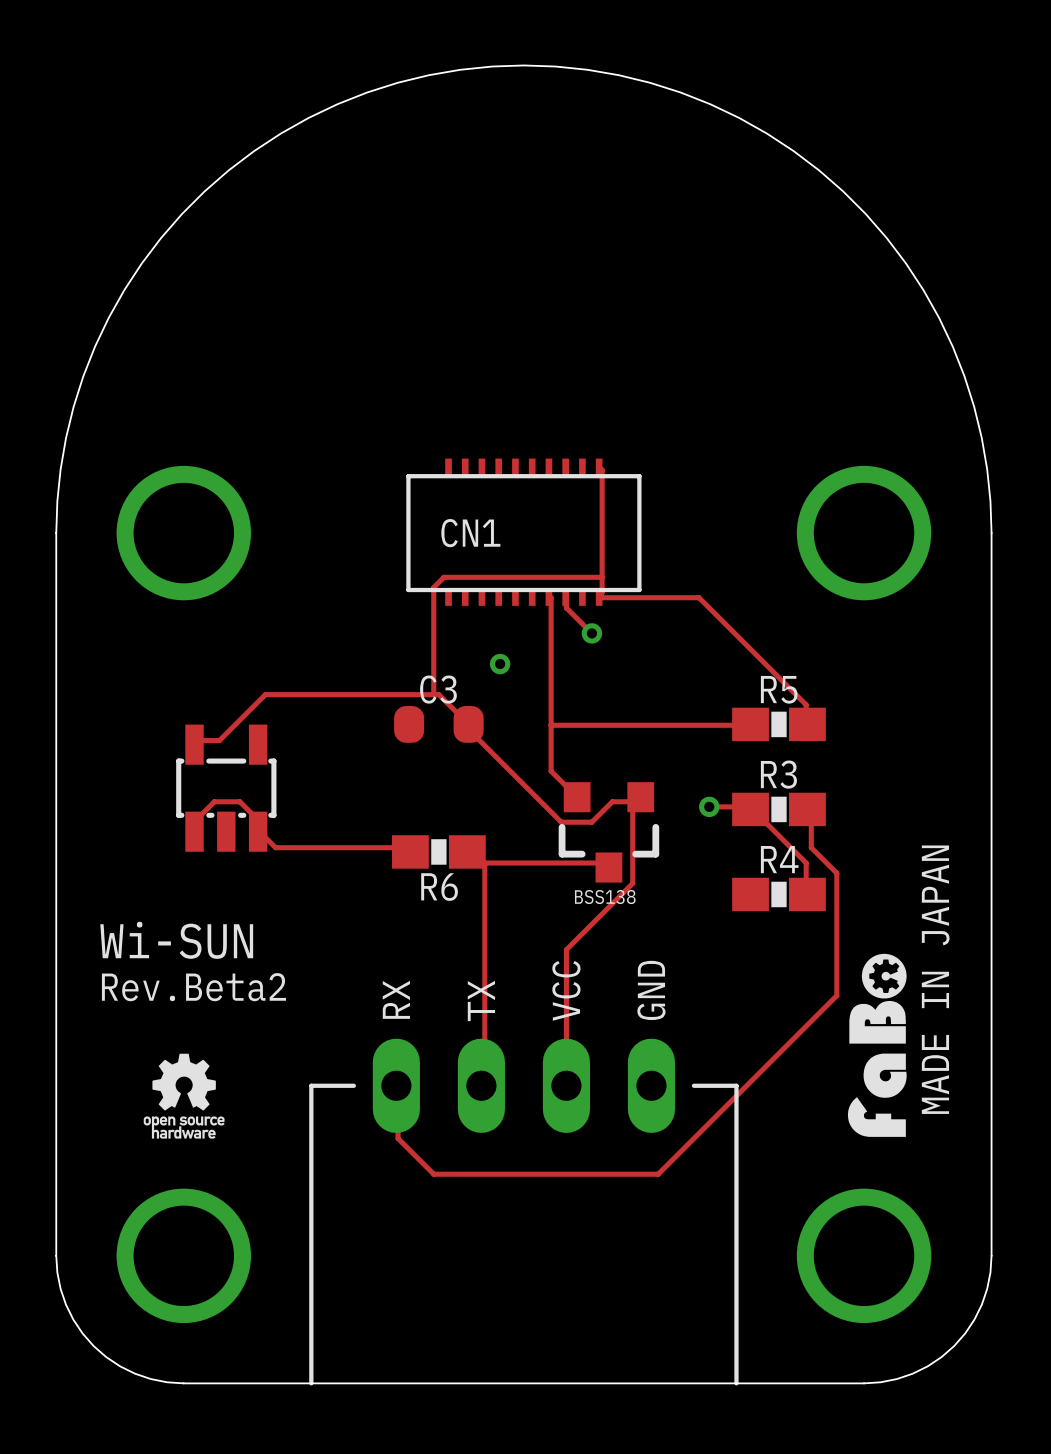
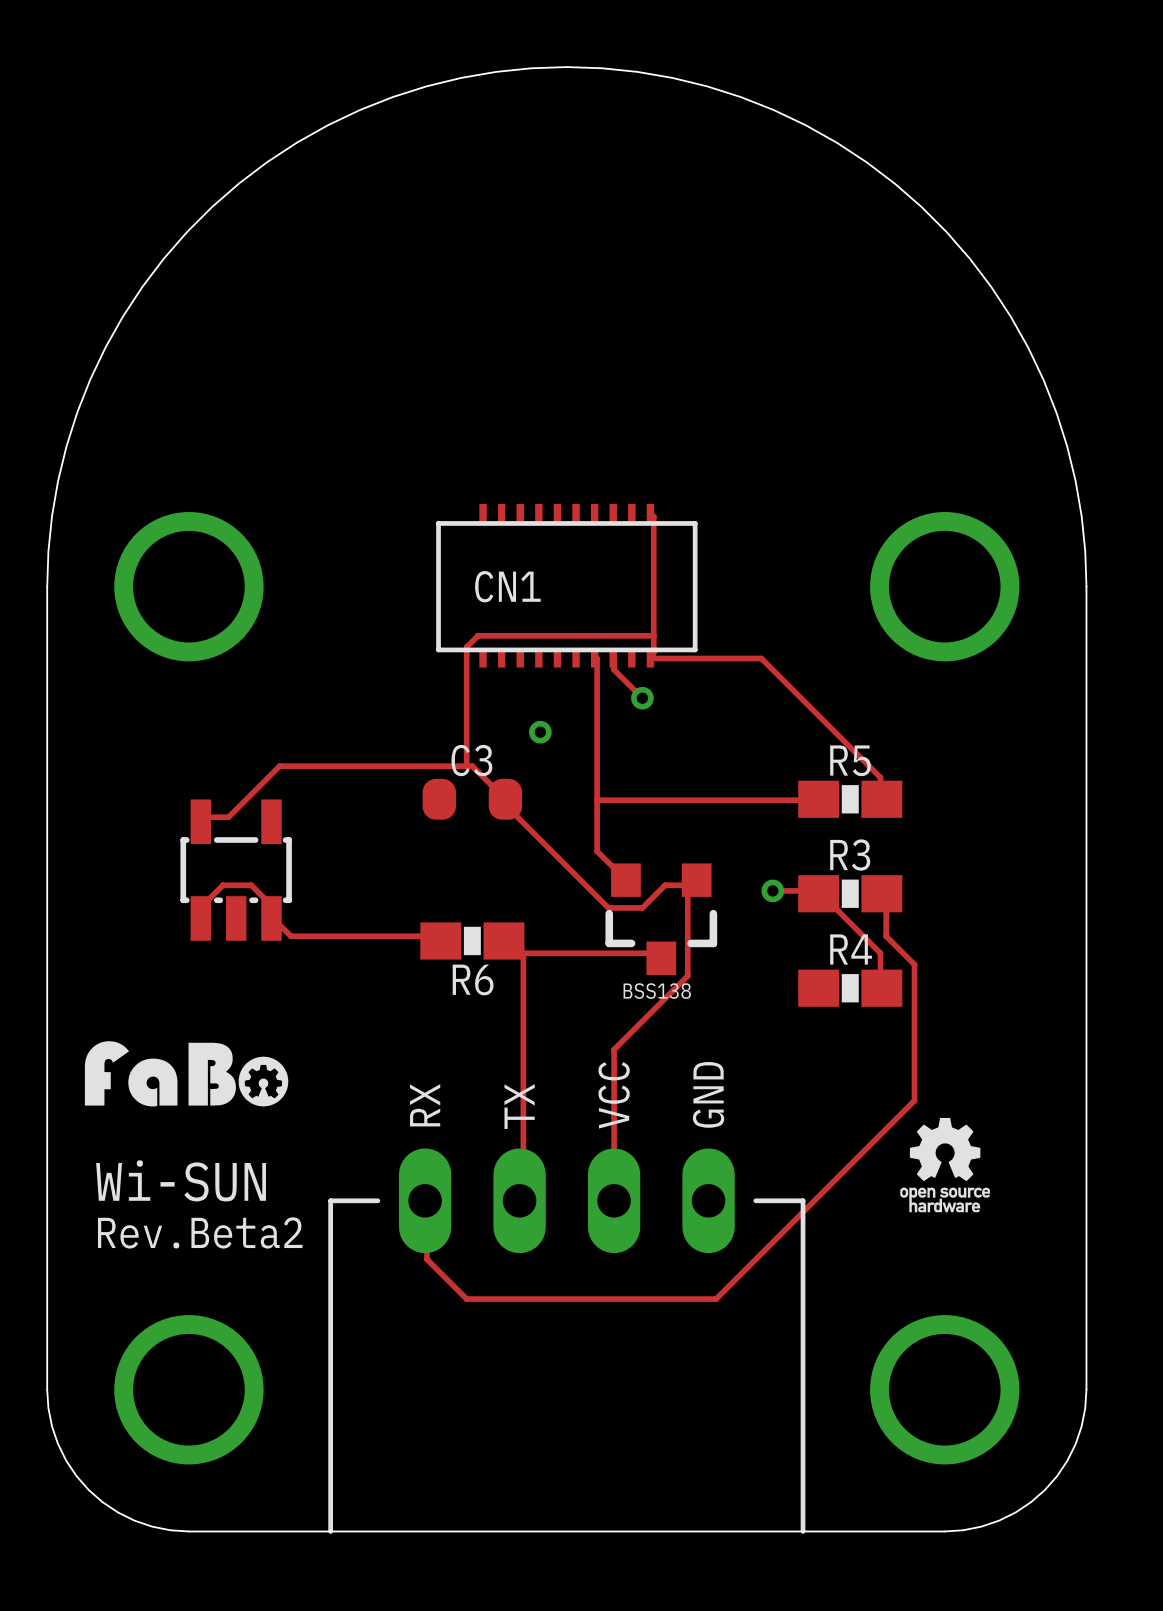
text position: Wi-SUN (176, 940) -> Wi-SUN (181, 1180)
drawing: none -> [84, 1041, 289, 1107]
drawing: [847, 953, 907, 1137] -> none
text: MADE IN JAPAN (935, 979) -> none
text position: Rev.Beta2 (193, 987) -> Rev.Beta2 (200, 1232)
drawing position: (184, 1096) -> (945, 1165)

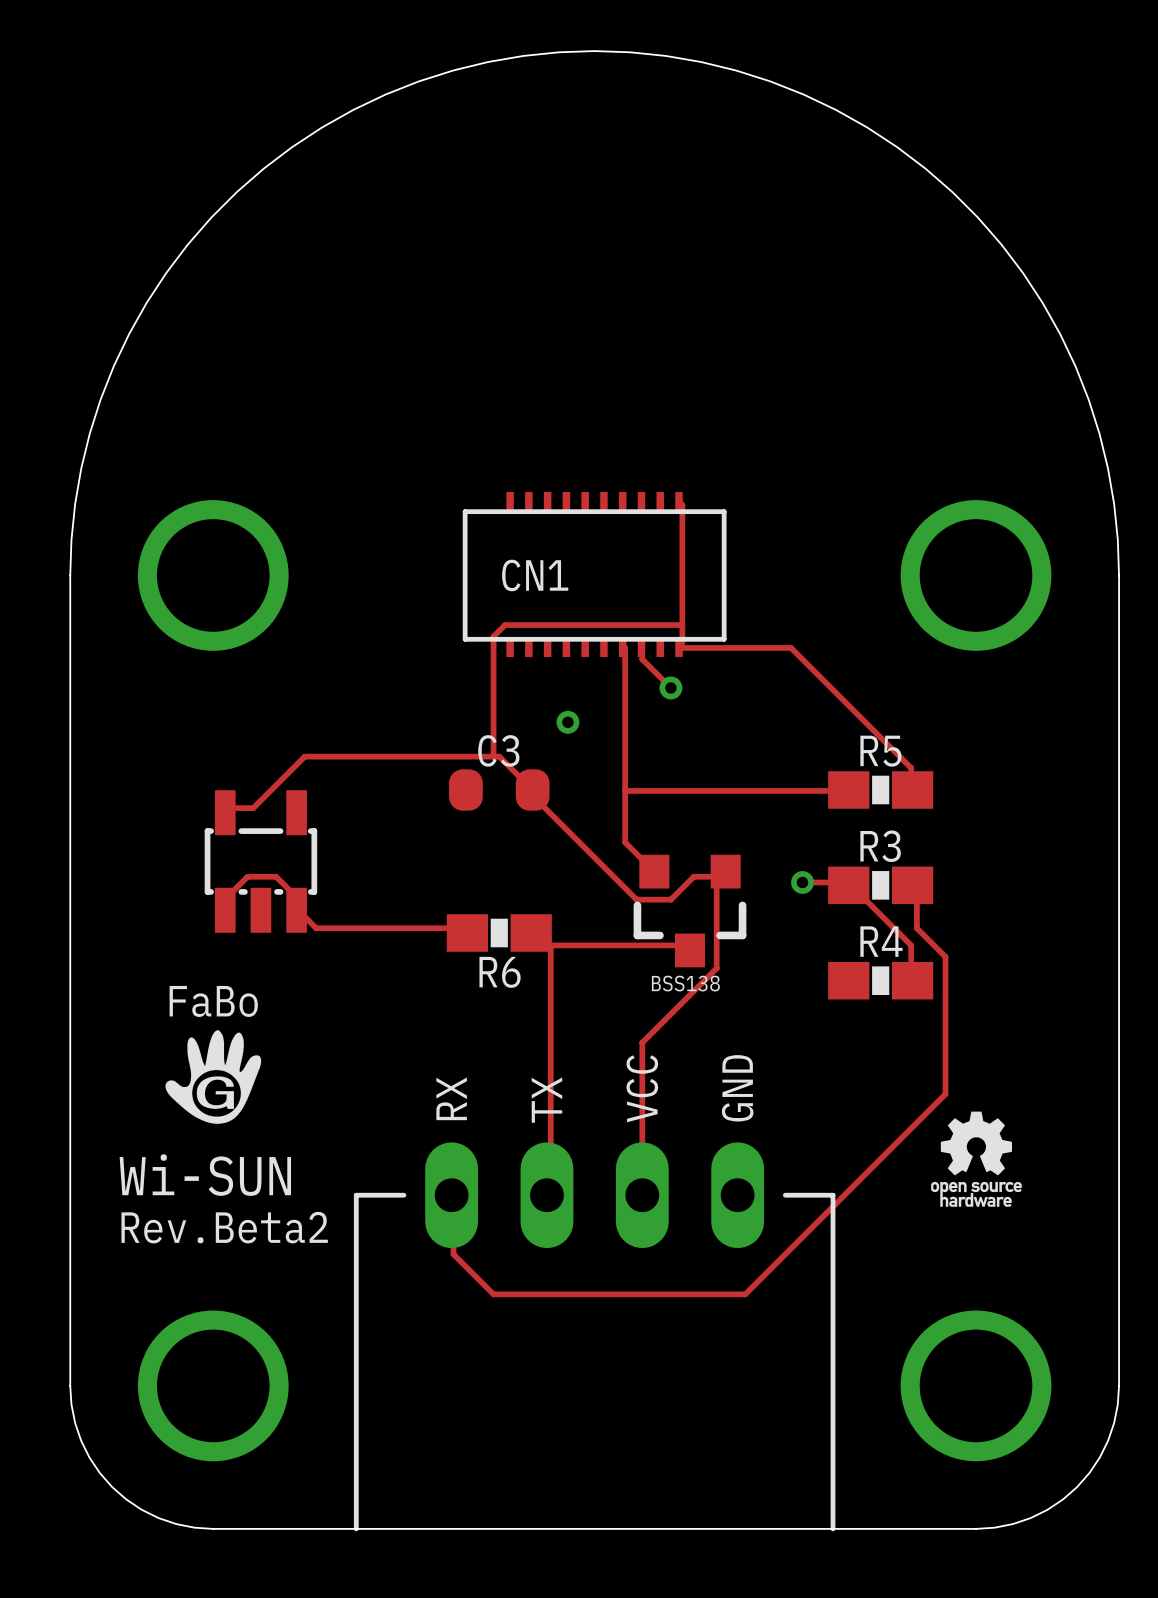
drawing shape: [84, 1041, 289, 1107] -> [165, 985, 262, 1124]

